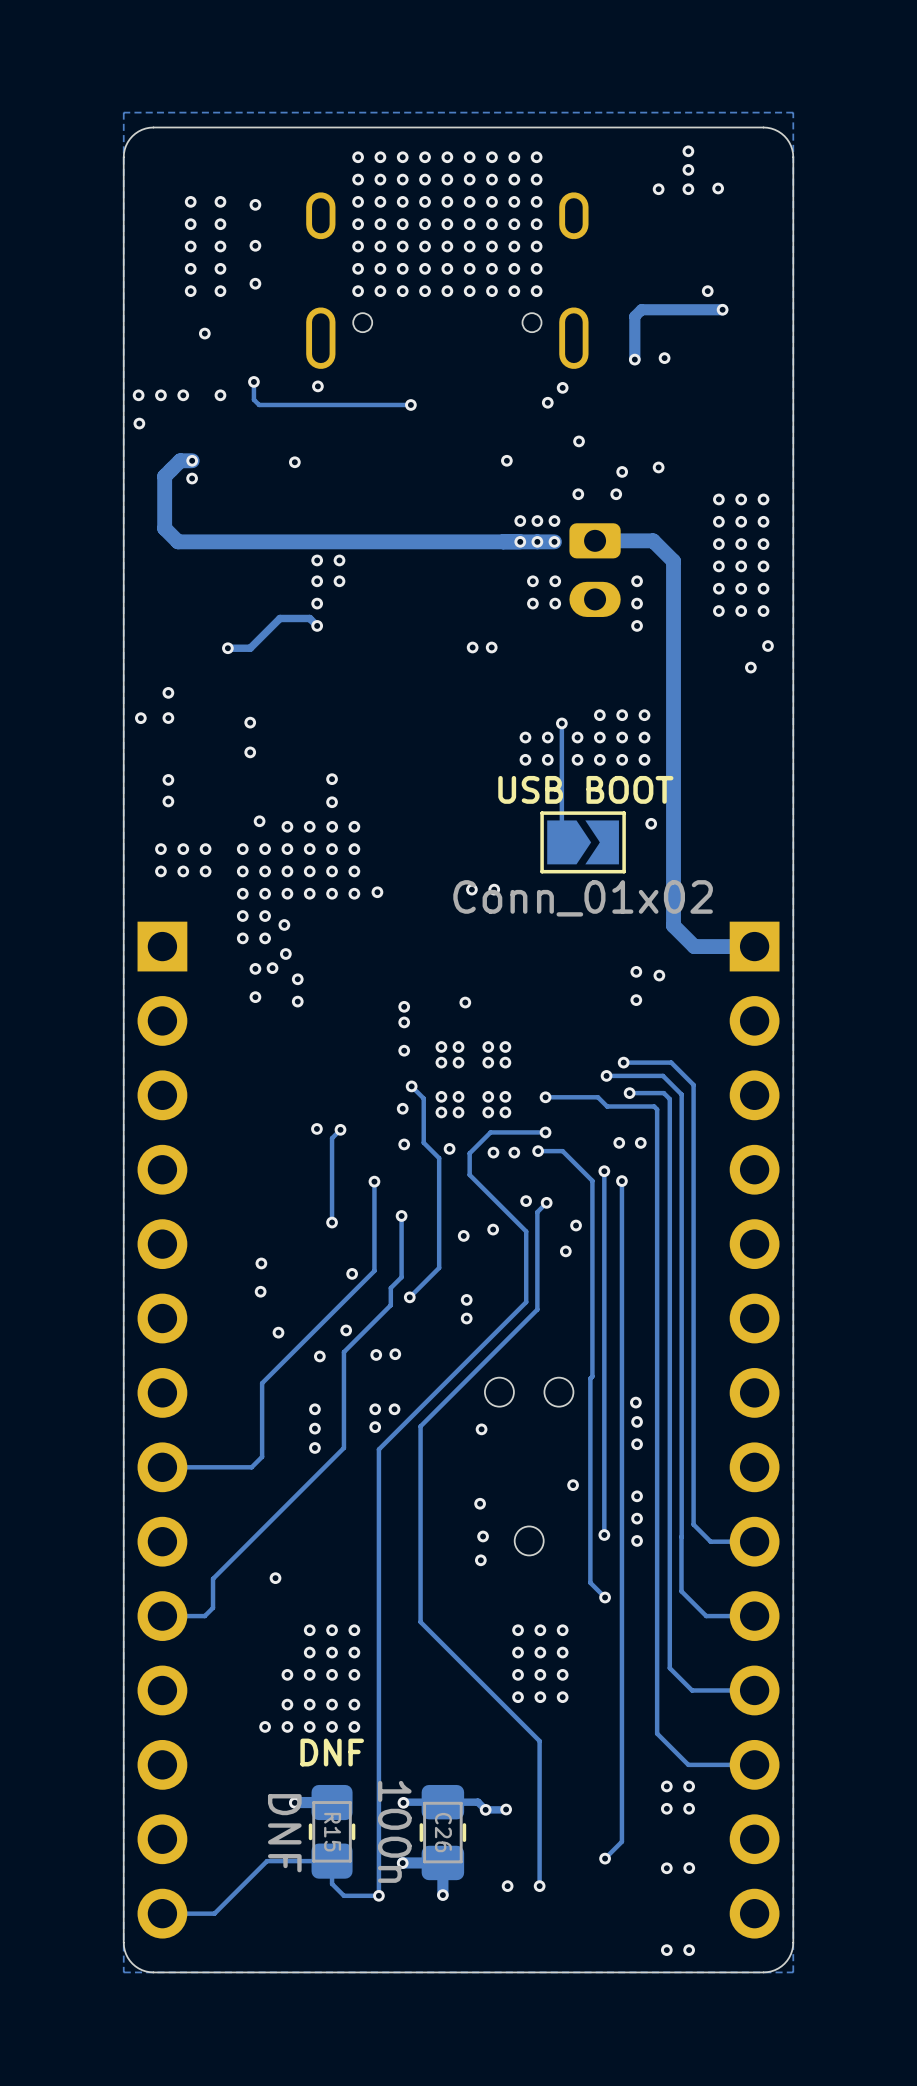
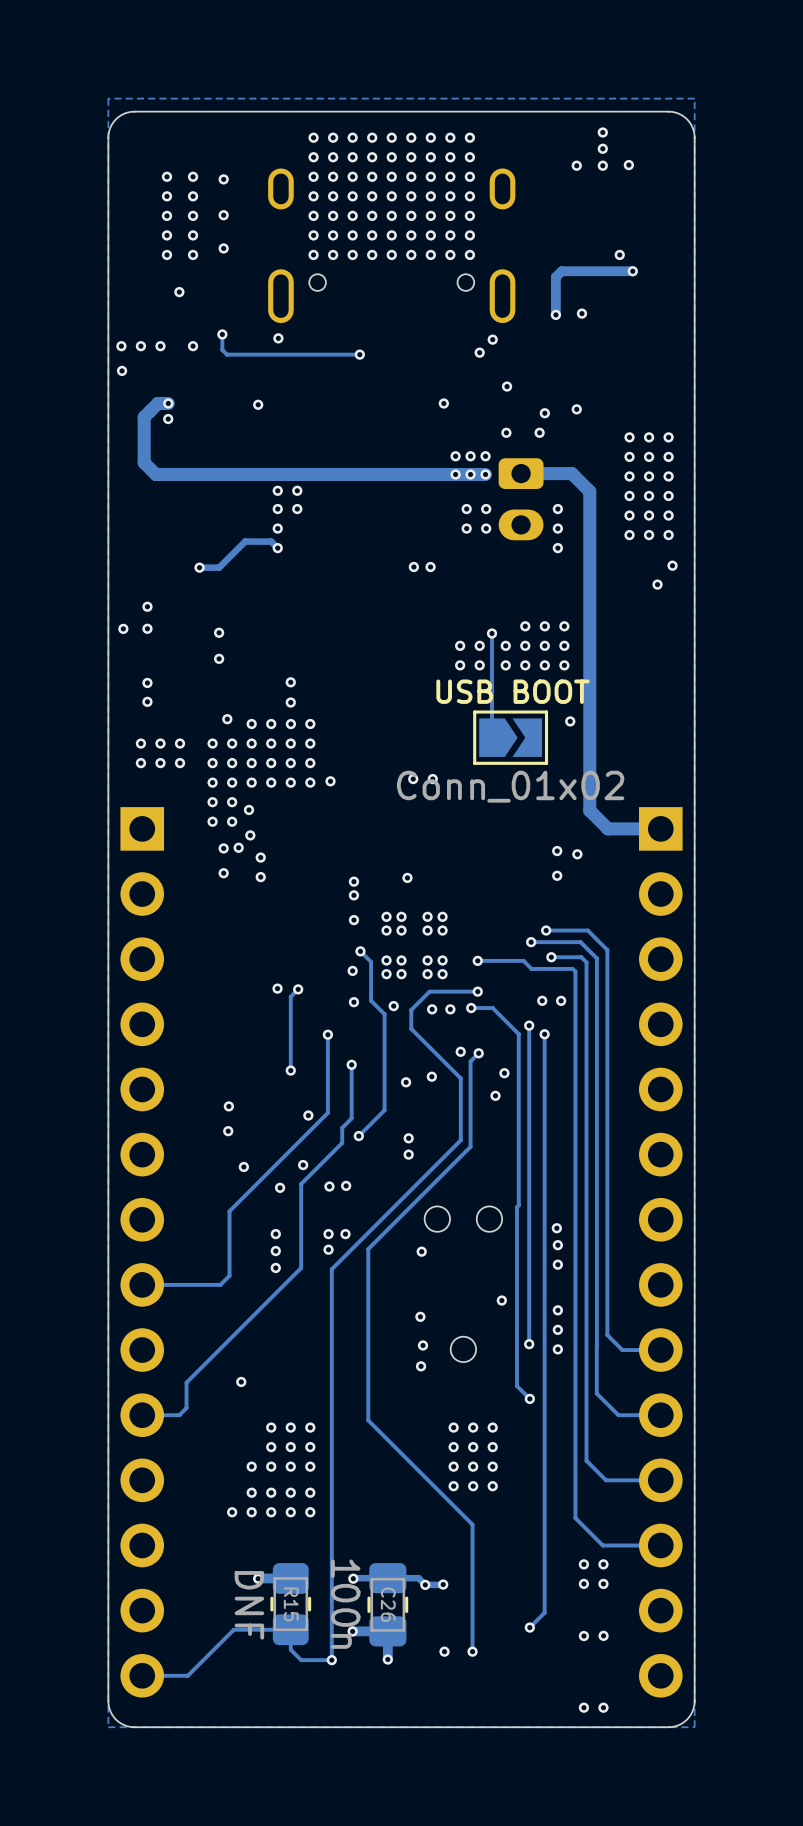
text: DNF (332, 1752) -> none

